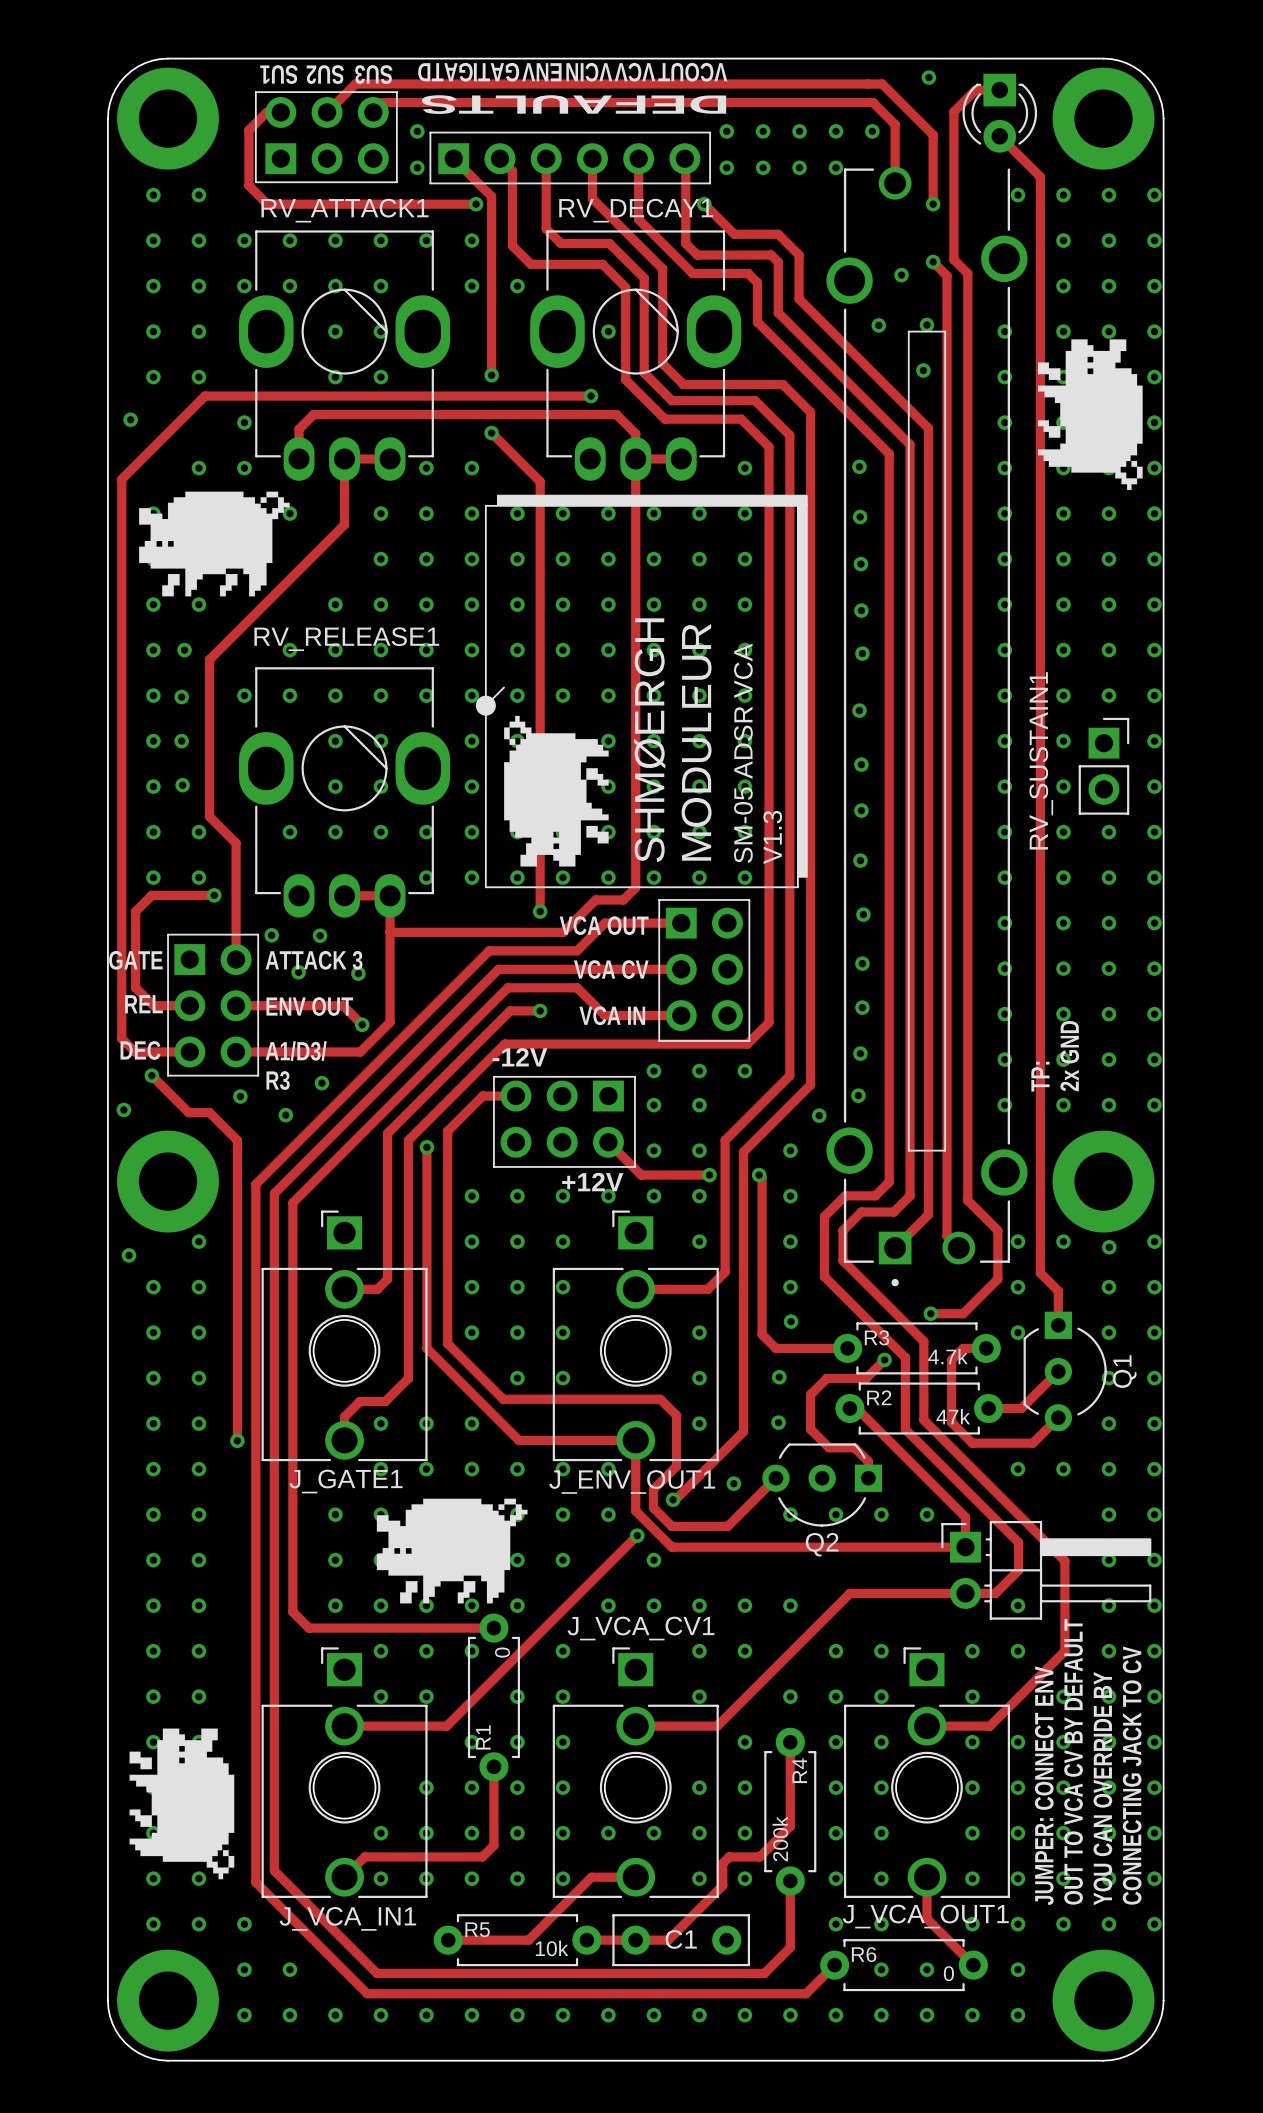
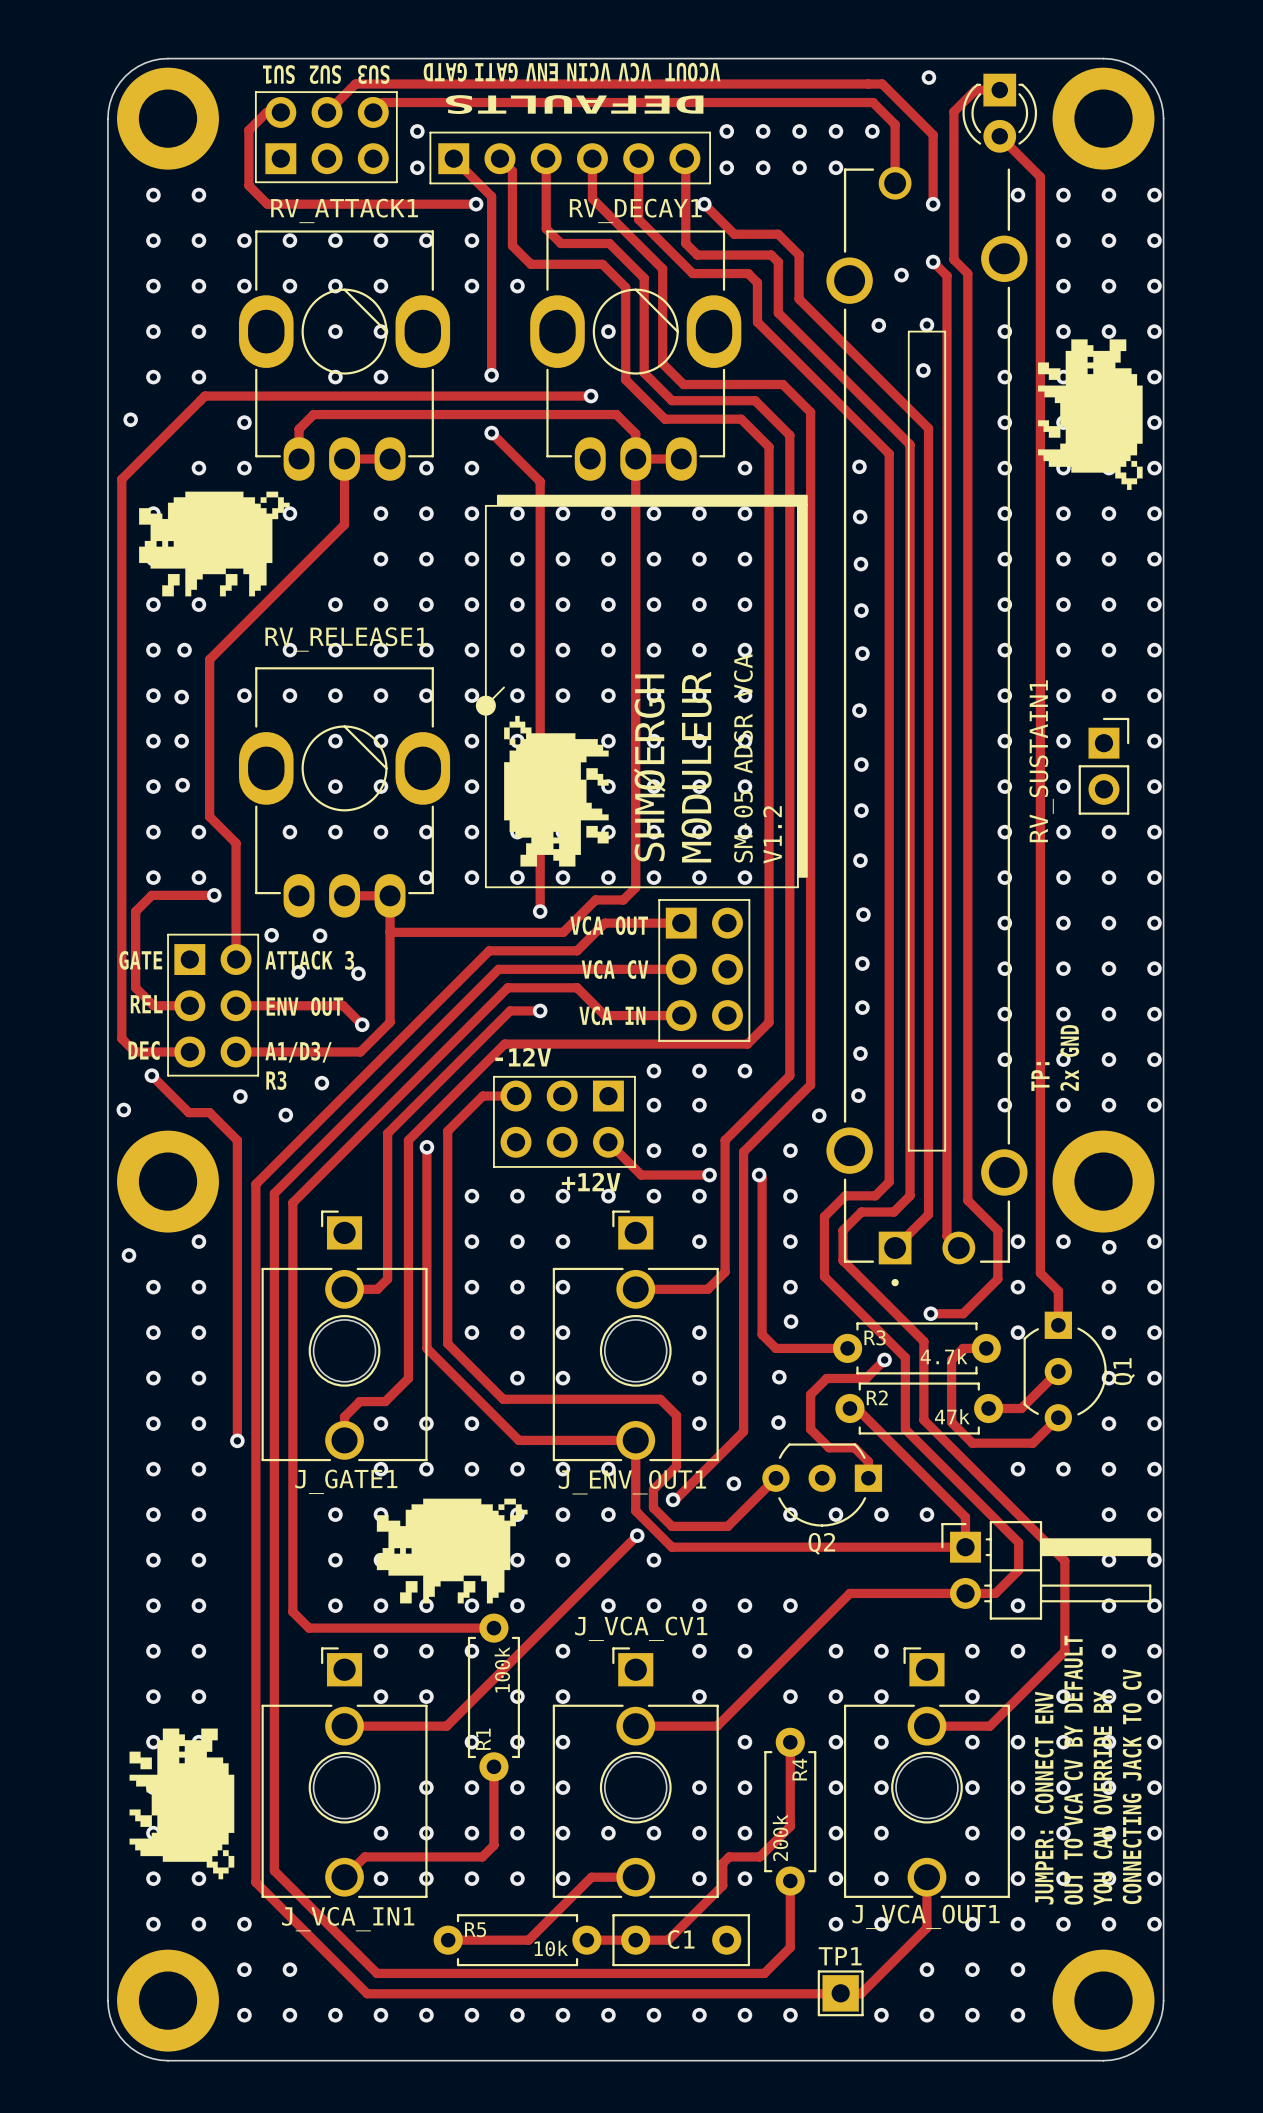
text: V1.3 (772, 837) -> V1.2 (772, 834)
R1 value: 0 (502, 1652) -> 100k (502, 1669)
track: (926, 1918) (973, 1965) -> none
track: (834, 1965) (806, 1993) -> (926, 1918) (926, 1927) (861, 1993) (806, 1993)
R6: 0 (904, 1965) -> none
via: (881, 1969) -> none
via: none -> (972, 1969)
TP1: none -> (840, 1993)
via: (835, 2015) -> none

